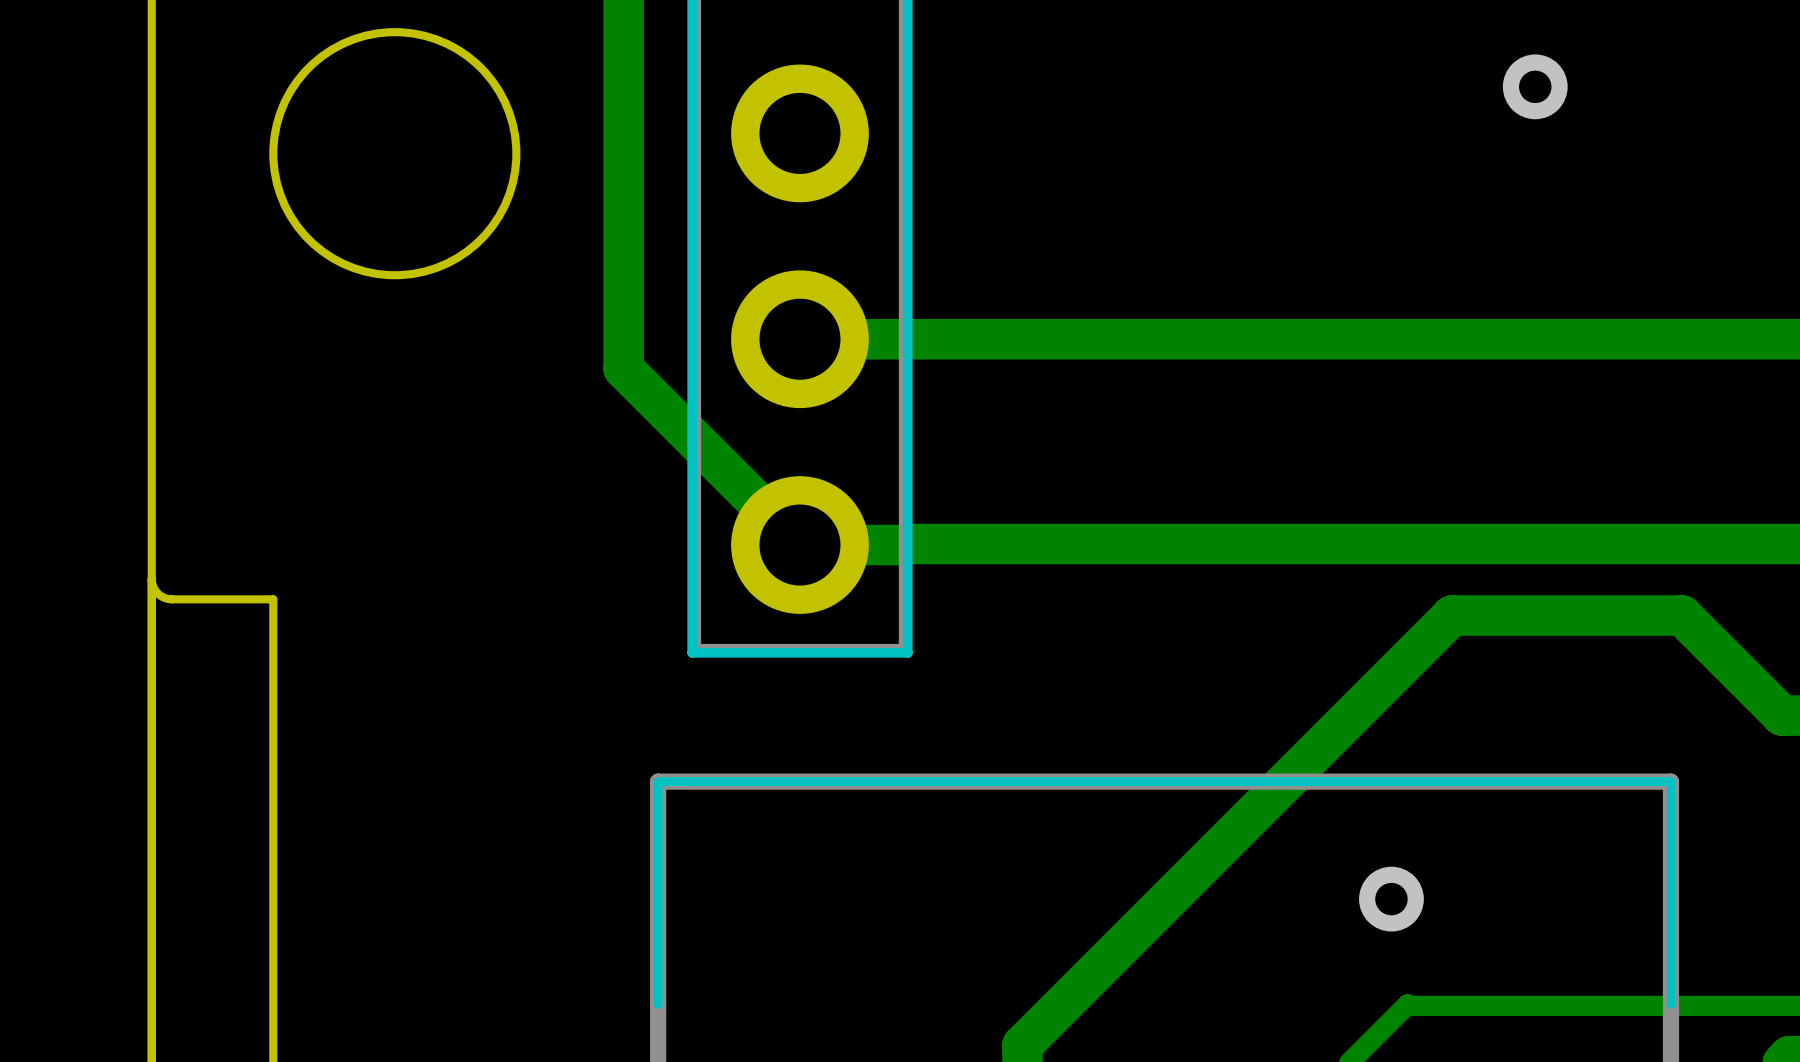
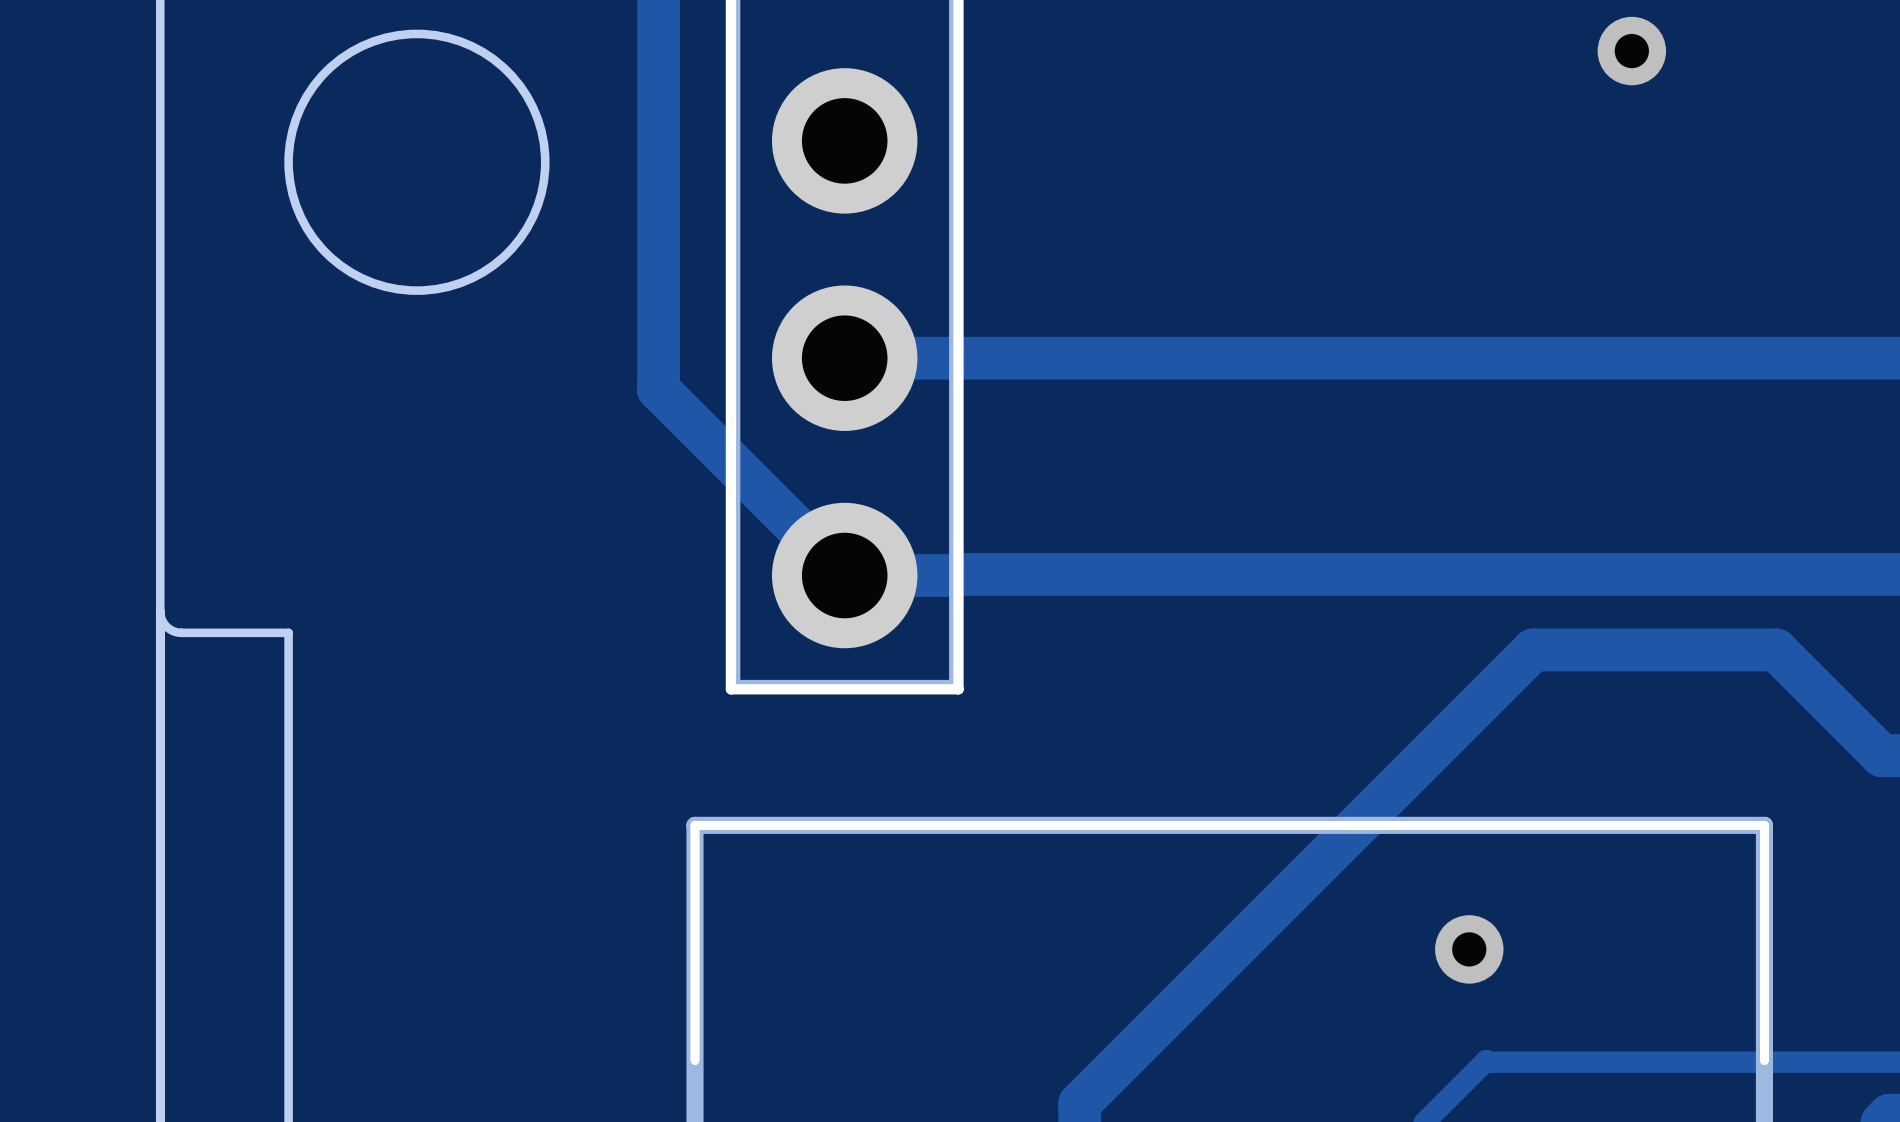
via position: (1535, 86) -> (1631, 51)

